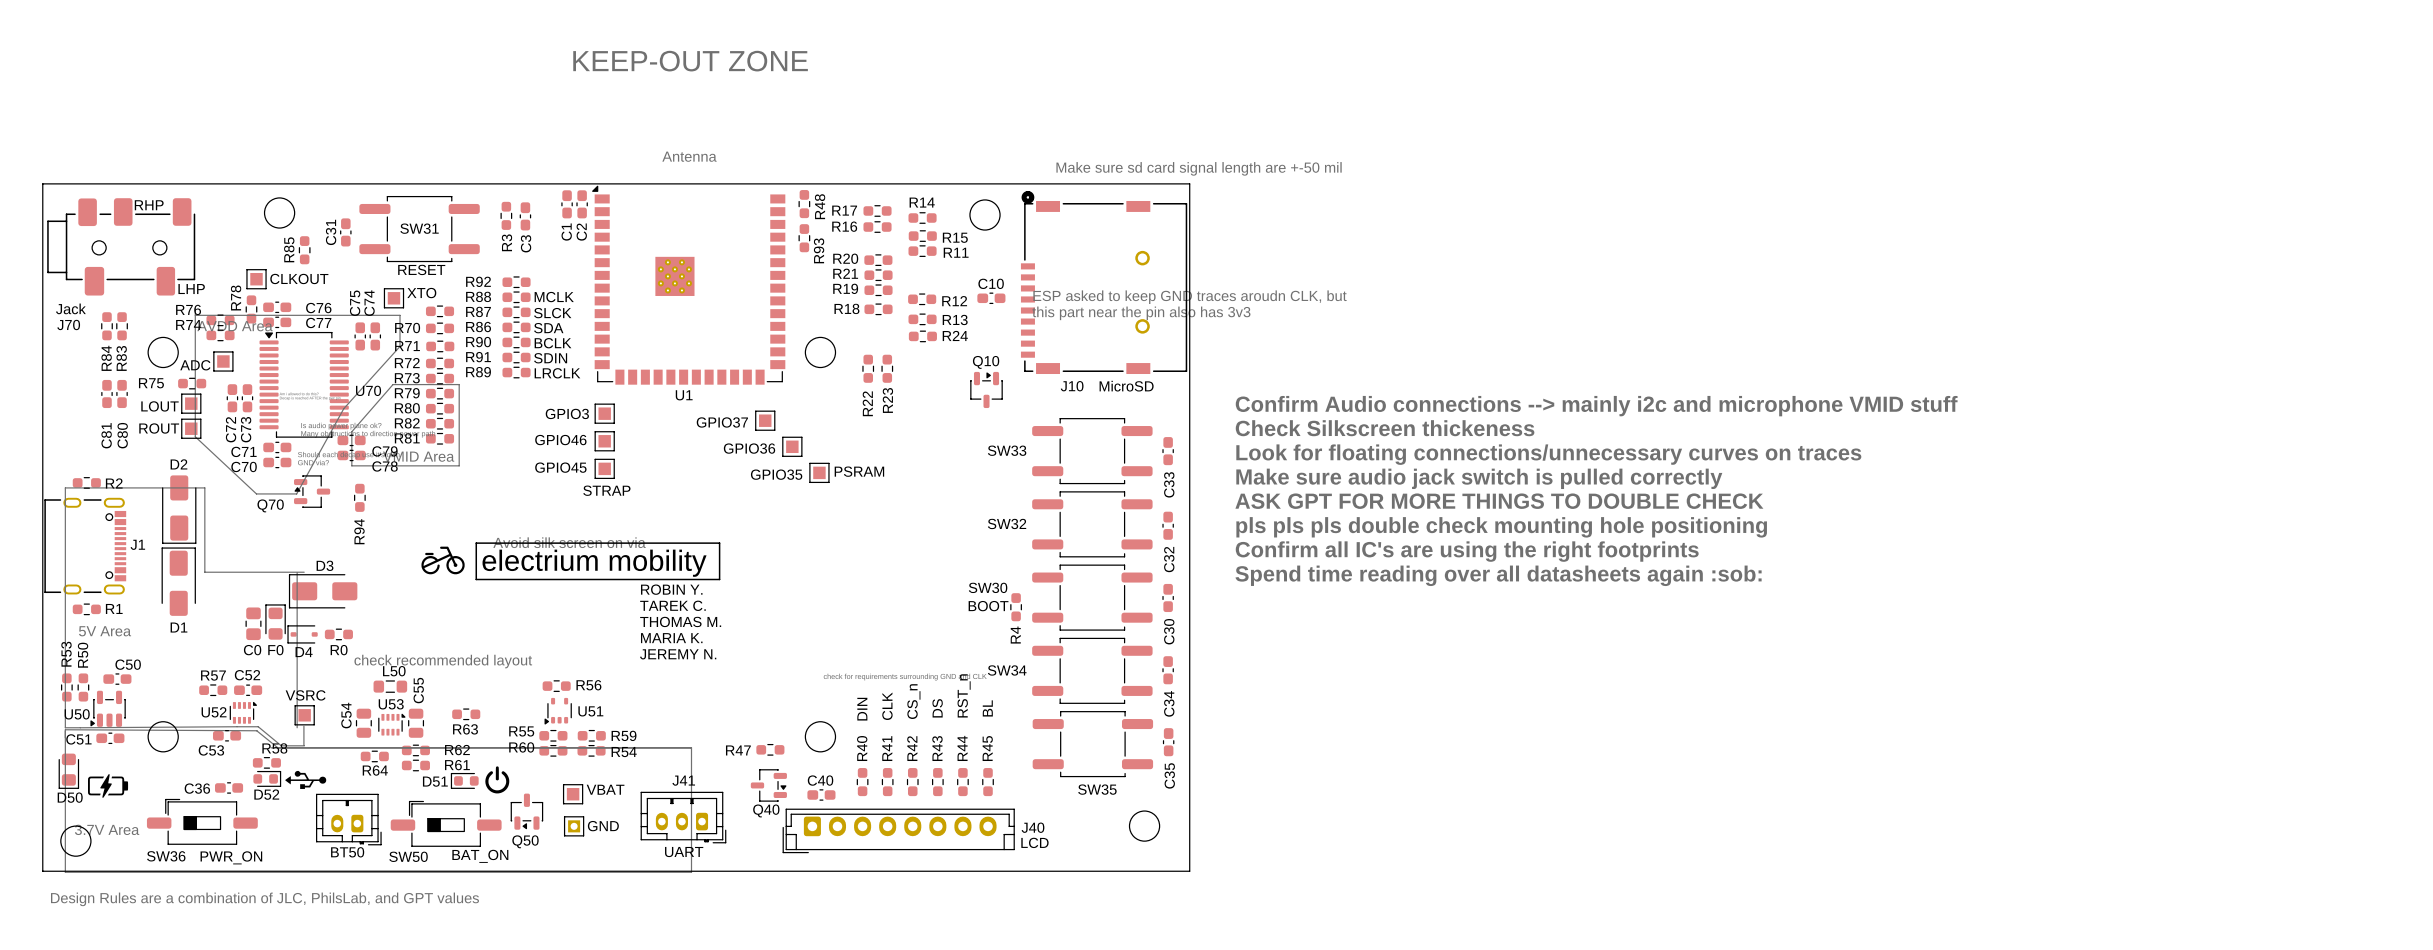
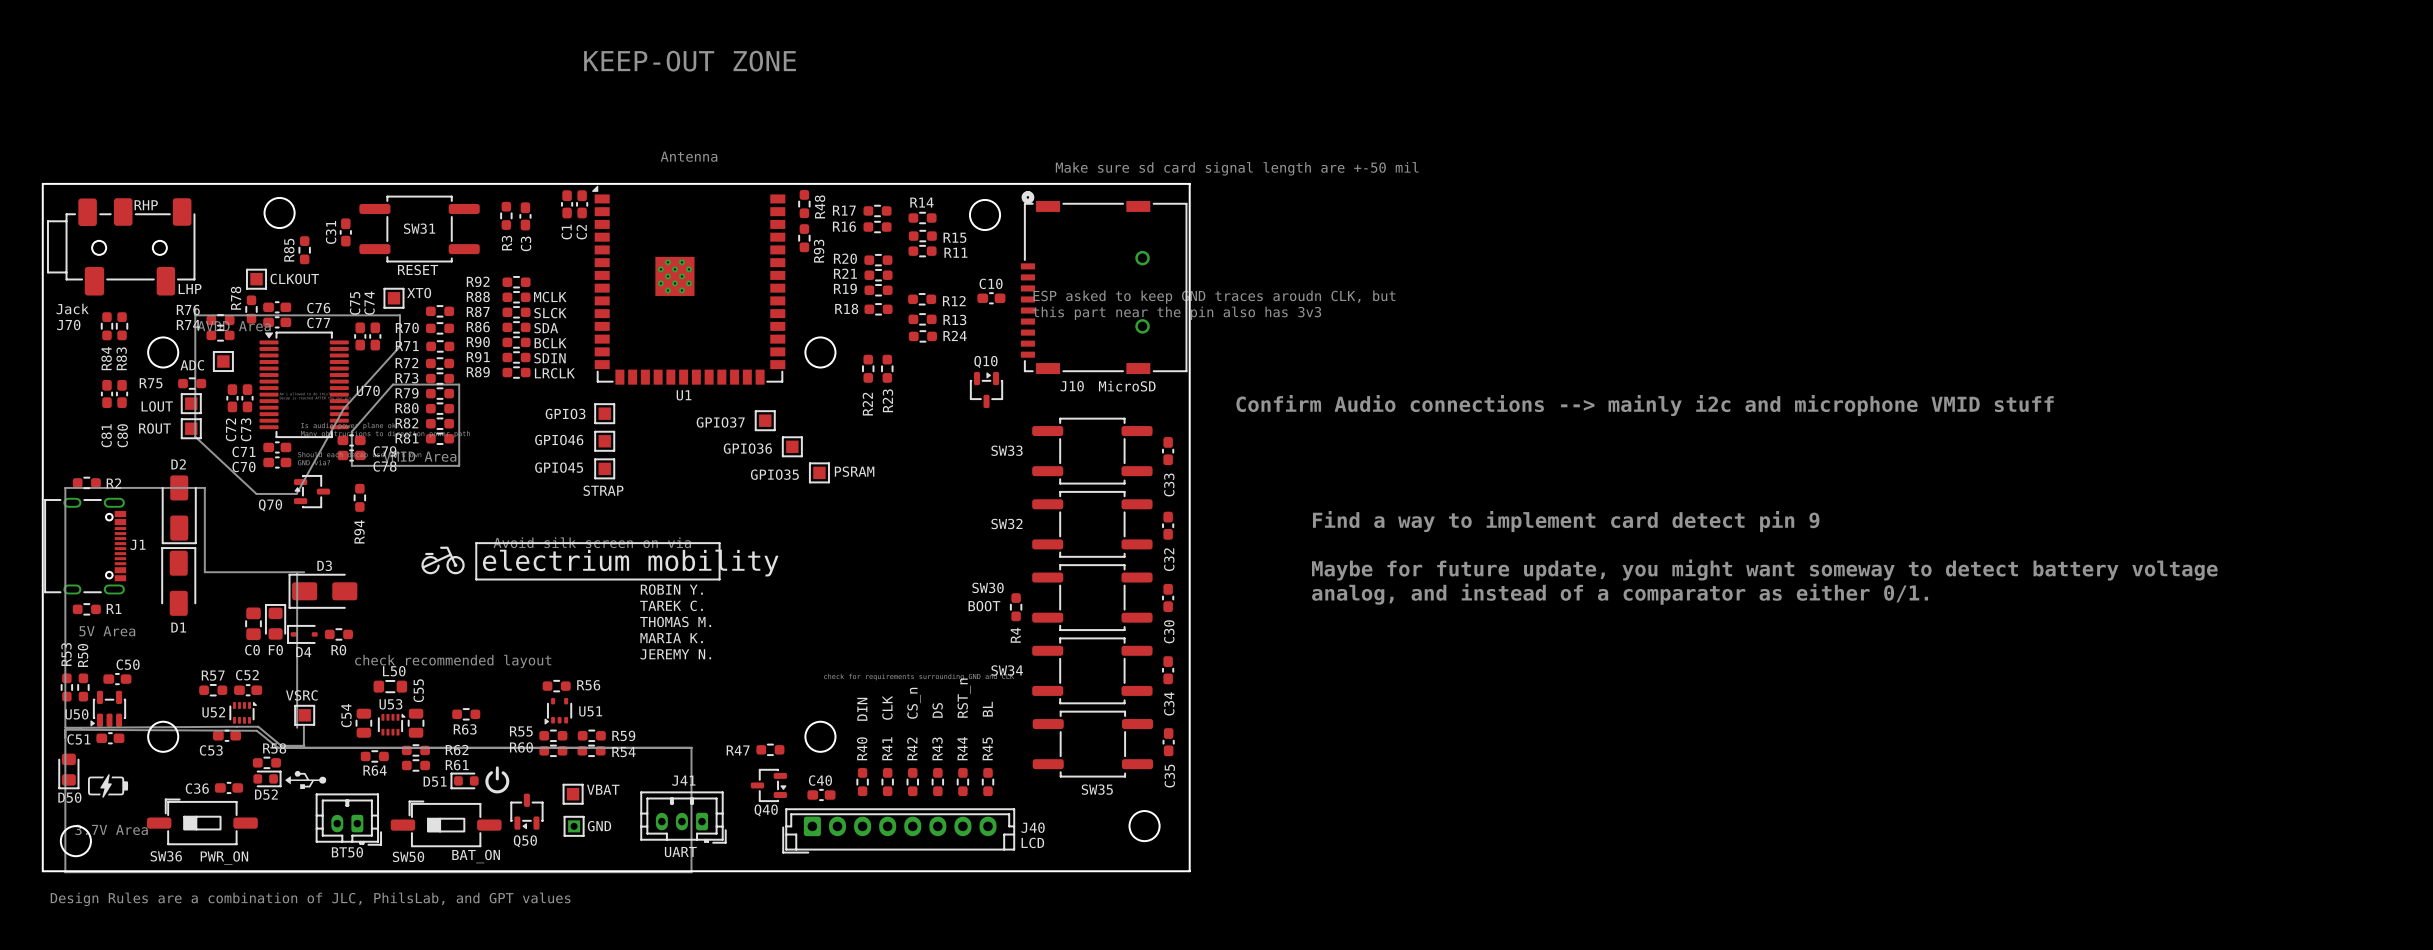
text: Check Silkscreen thickeness (1385, 428) -> none
text: Look for floating connections/unnecessary curves on traces (1548, 454) -> none
text: Make sure audio jack switch is pulled correctly (1479, 478) -> none
text: ASK GPT FOR MORE THINGS TO DOUBLE CHECK (1499, 501) -> none
text: none -> Find a way to implement card detect pin 9 (1566, 521)
text: pls pls pls double check mounting hole positioning (1501, 527) -> none
text: Confirm all IC's are using the right footprints (1467, 551) -> none
text: none -> Maybe for future update, you might want someway to detect battery voltage (1764, 570)
text: Spend time reading over all datasheets again :sob: (1498, 575) -> none
text: none -> analog, and instead of a comparator as either 0/1. (1620, 594)

